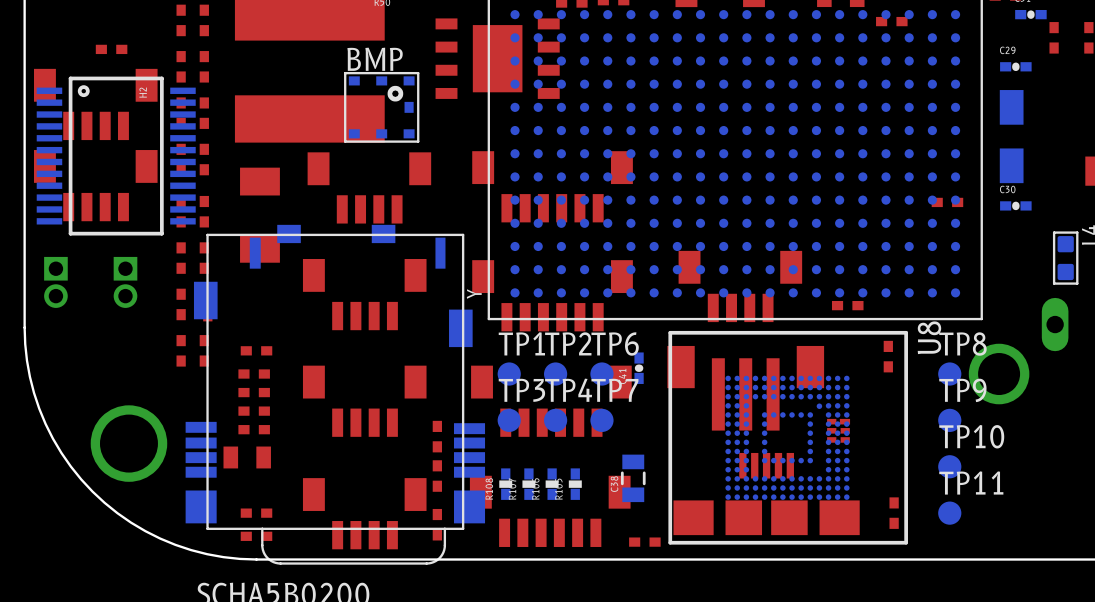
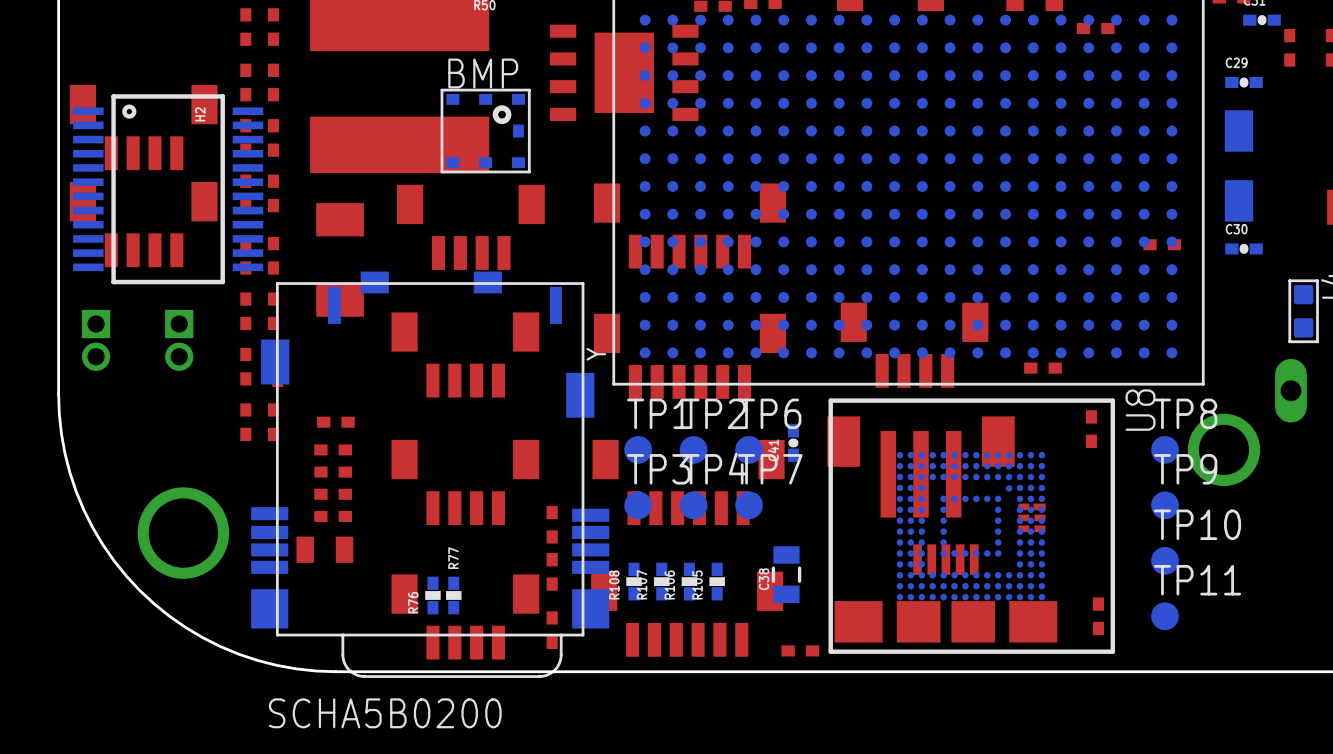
part: (111, 49) -> none
R77 side: top (256, 513) -> bottom (453, 595)
R76 side: top (256, 536) -> bottom (432, 595)

